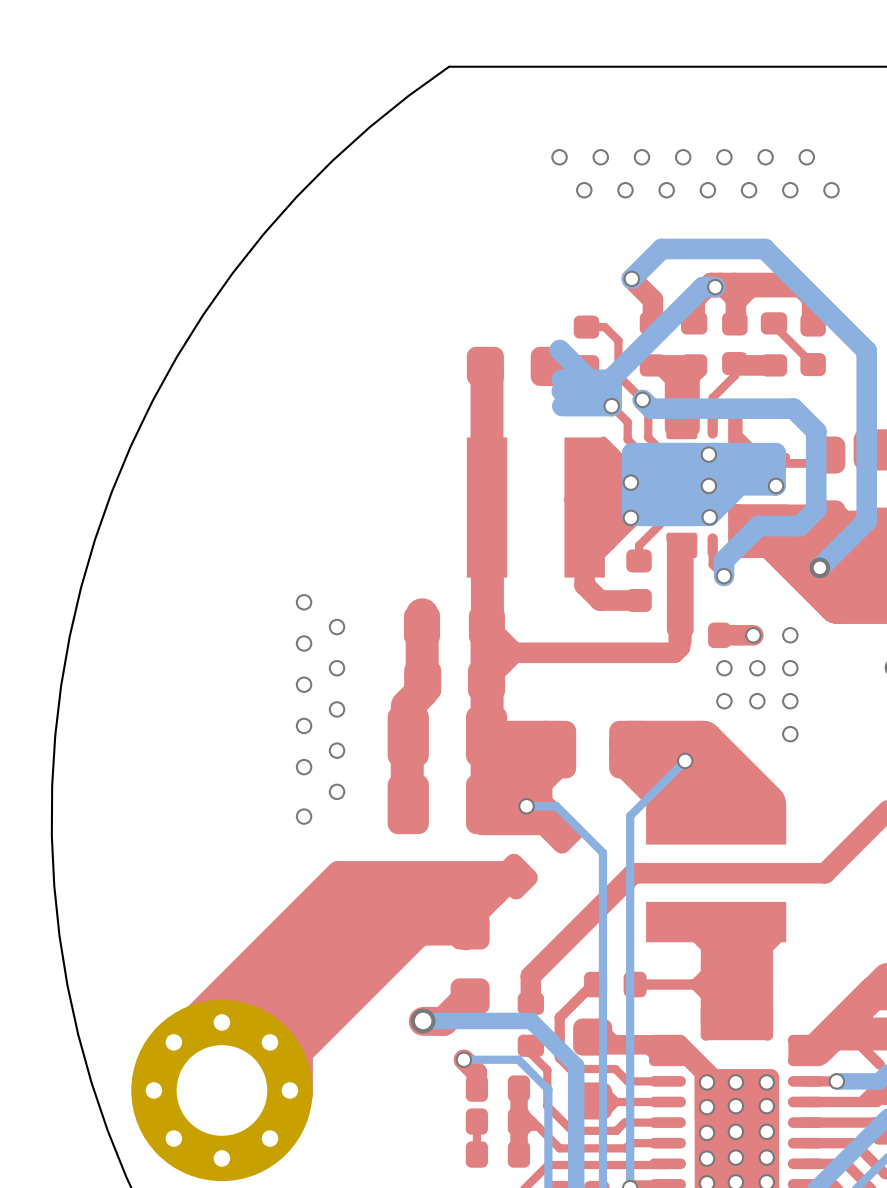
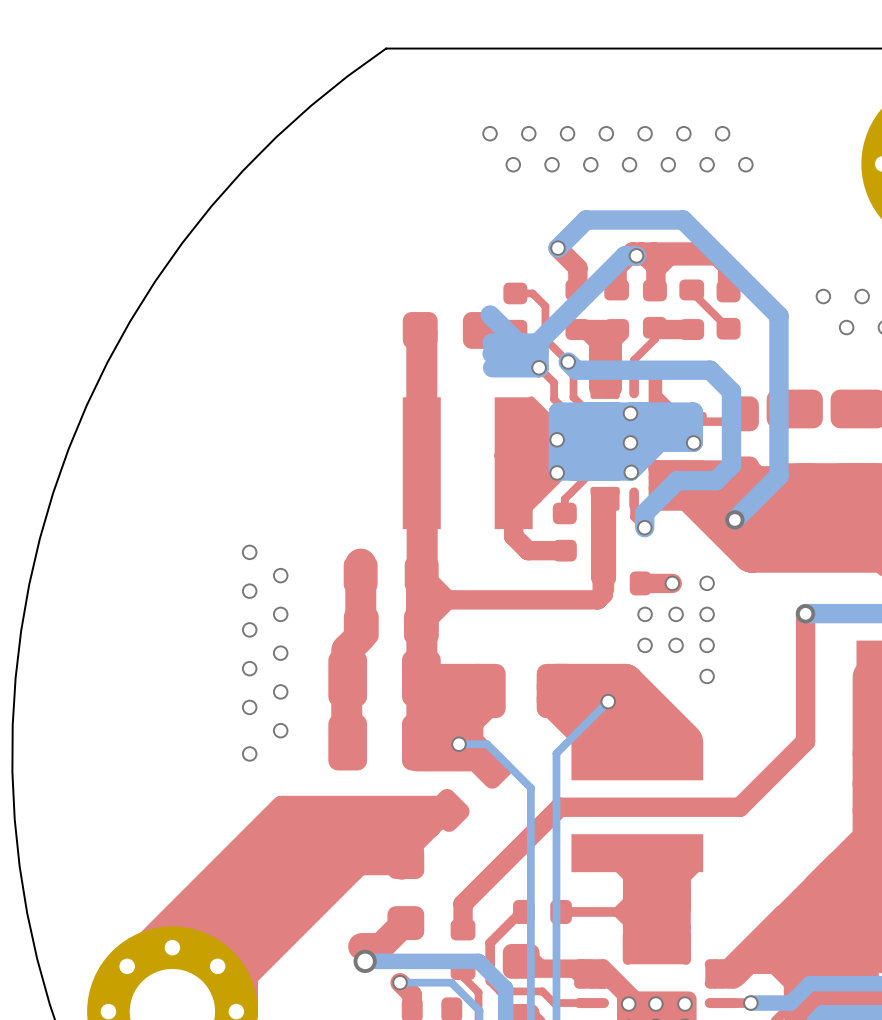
bottom track: (423, 1020) (531, 1020) (547, 1037) -> (365, 961) (478, 961)
via position: (423, 1020) -> (365, 961)

